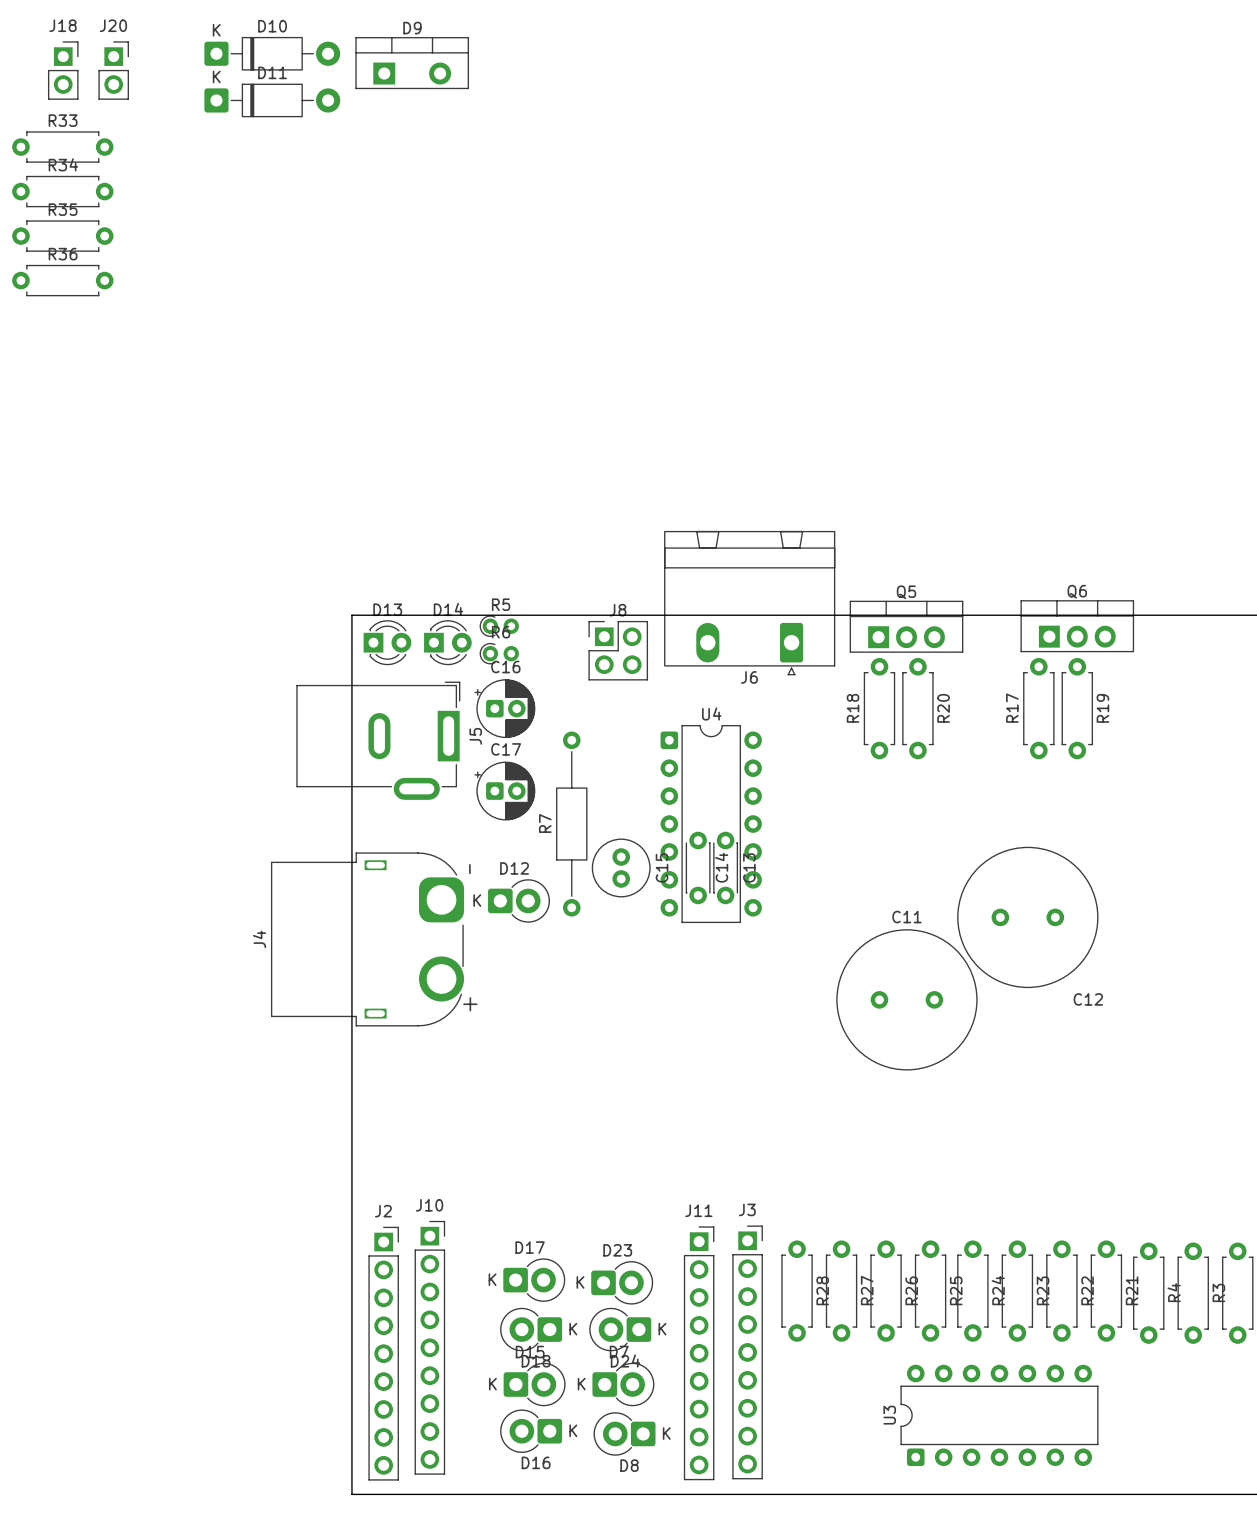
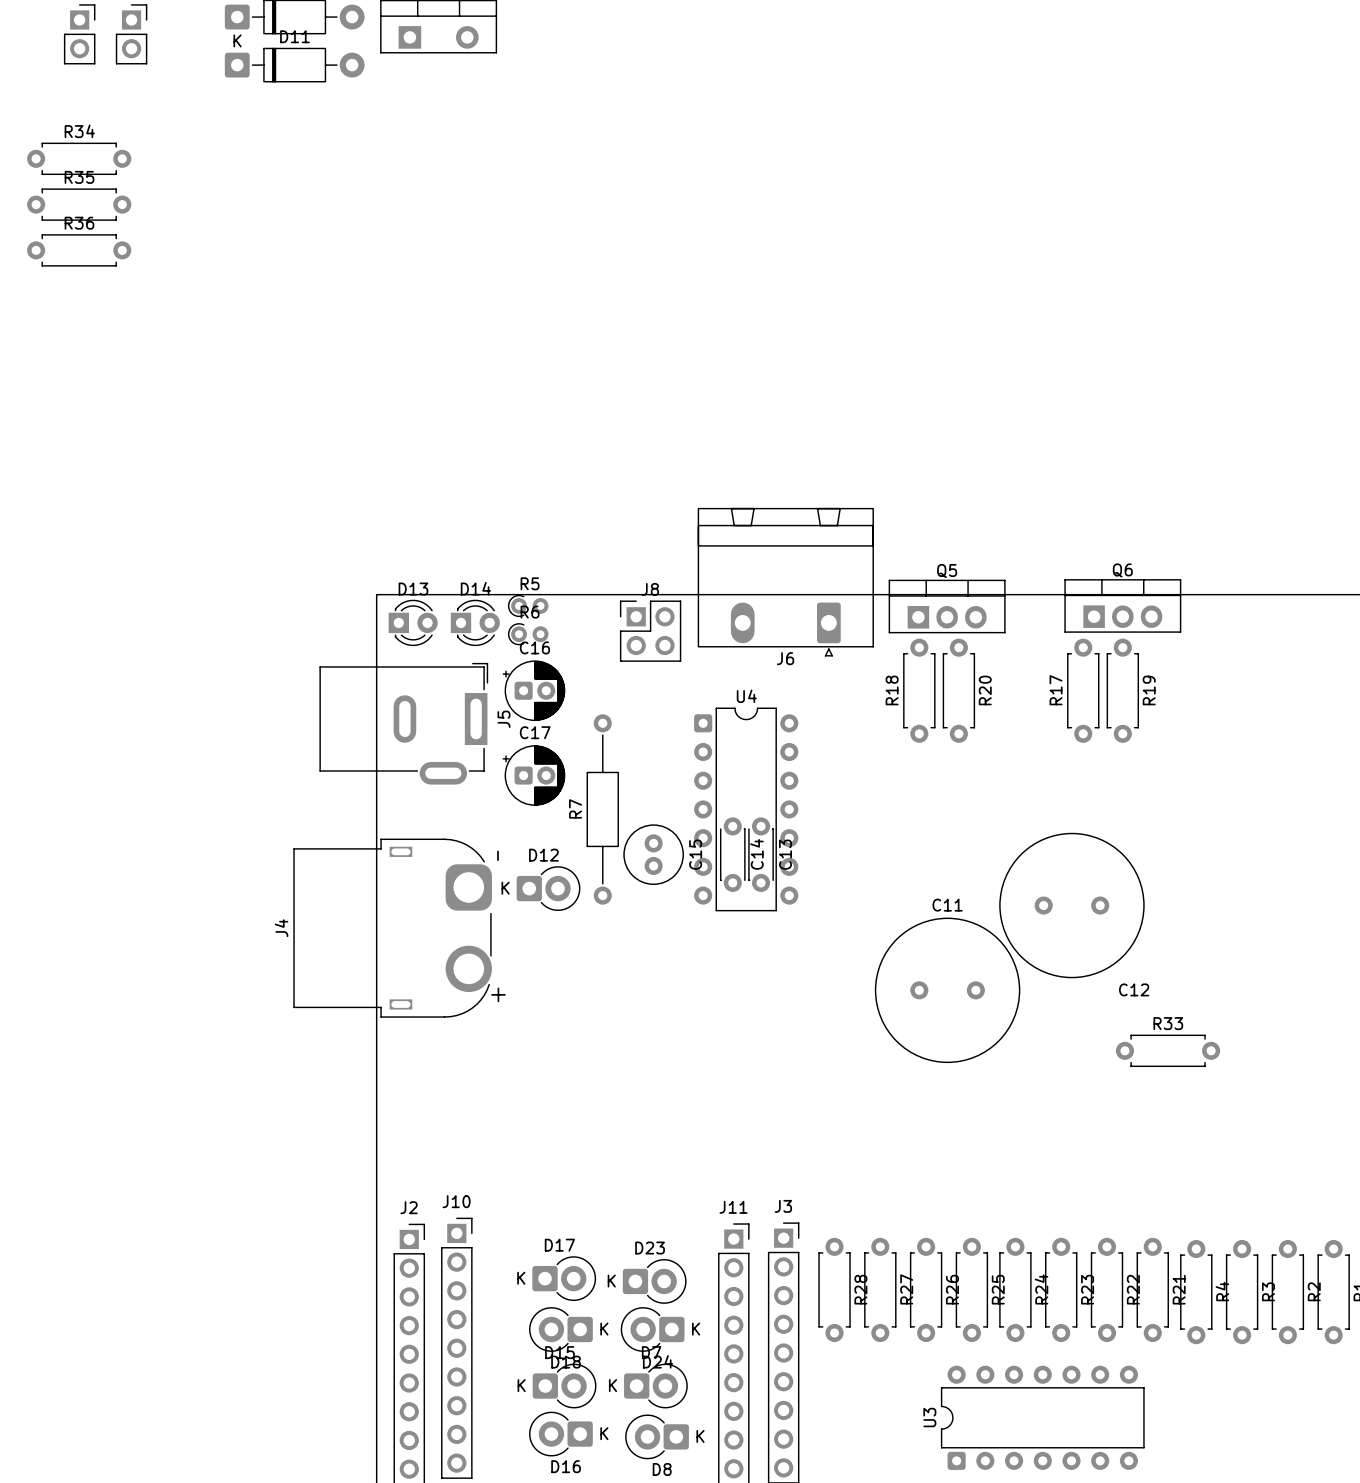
R33 position: (62, 147) -> (1168, 1050)

